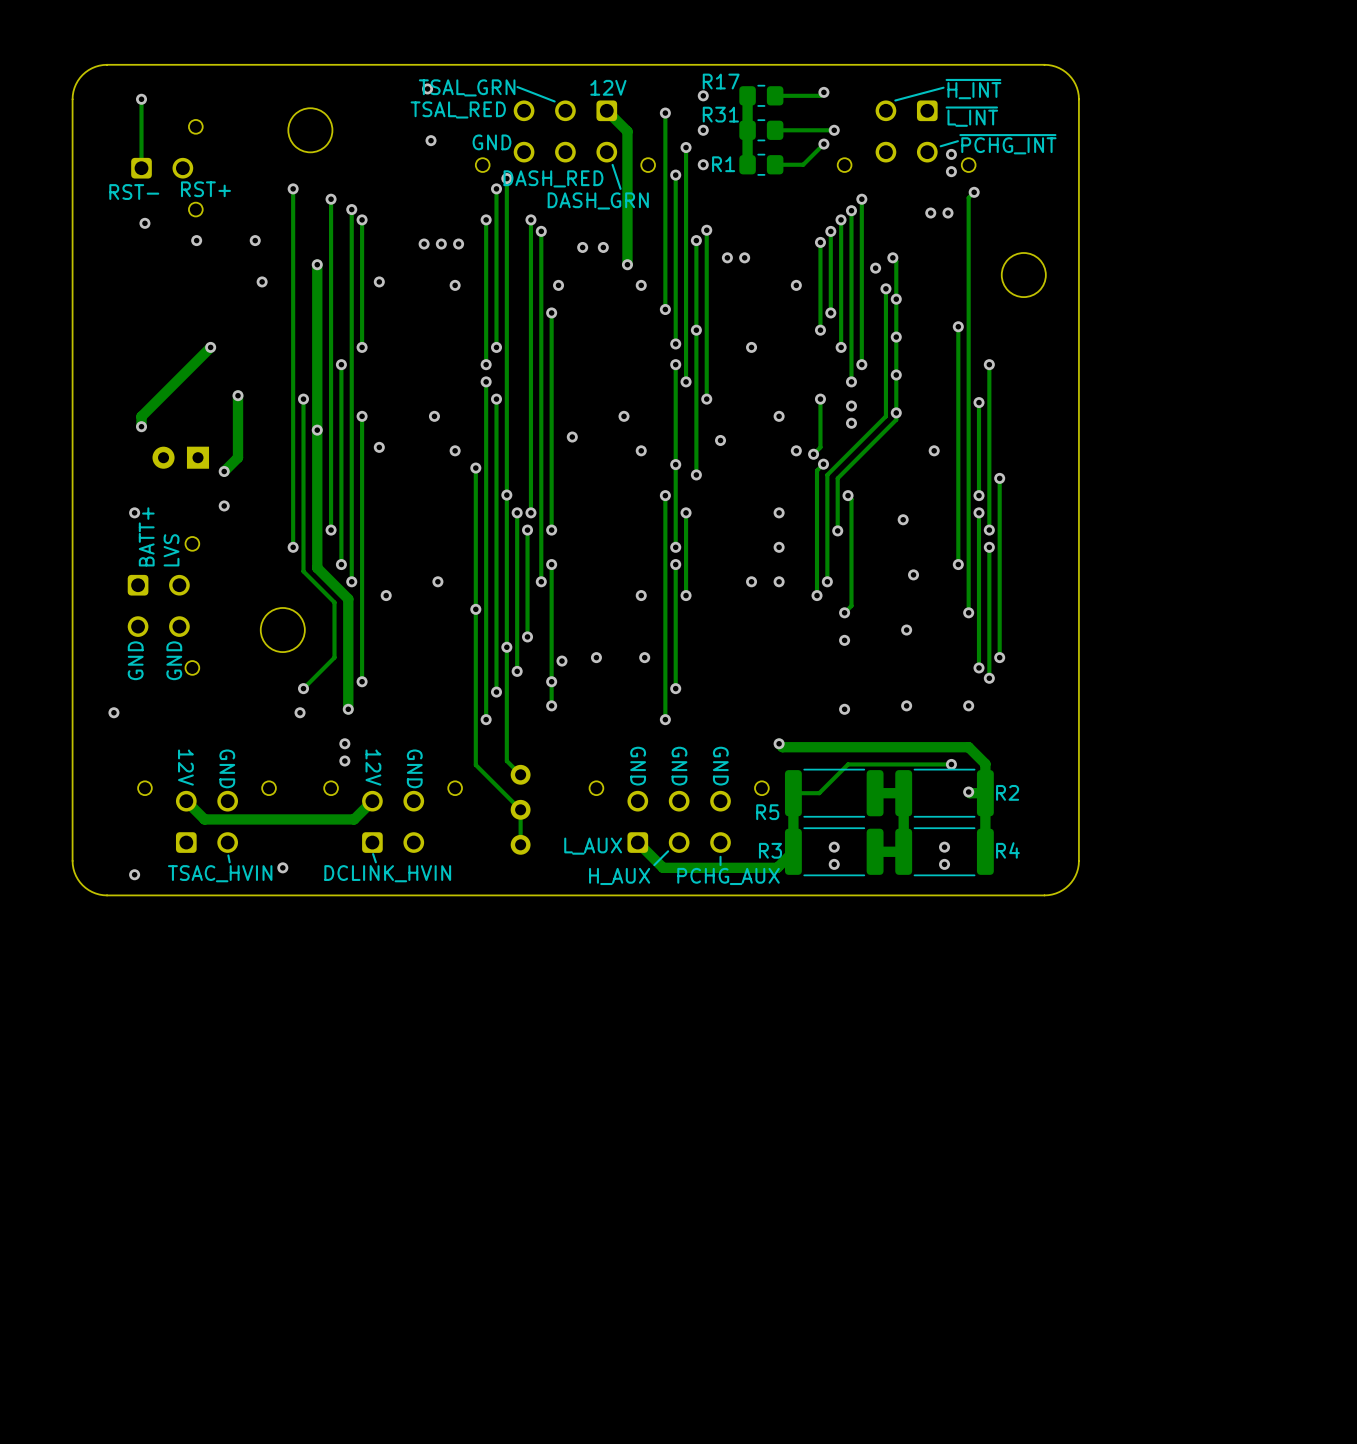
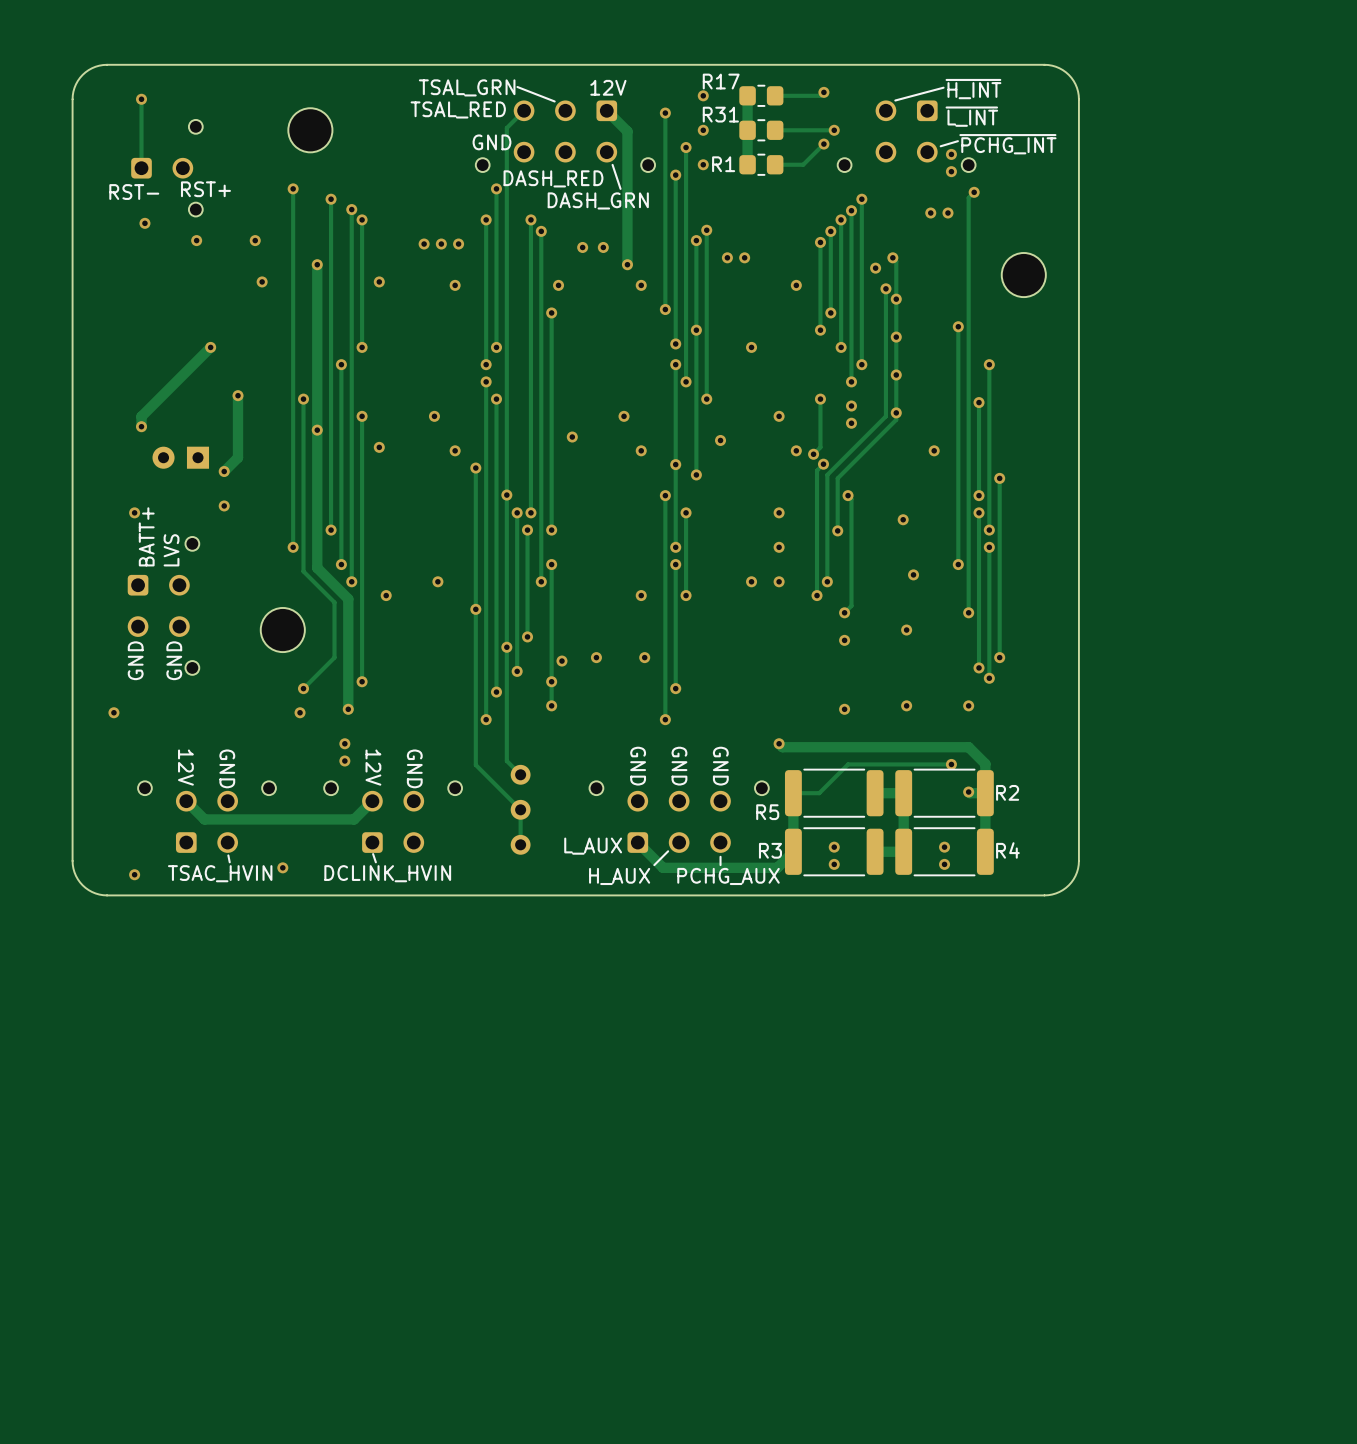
via: (427, 88) -> none
track: none -> (524, 110) (506, 128) (506, 178)
via: (431, 140) -> none
via: (506, 178) -> none

